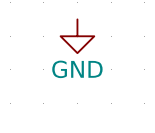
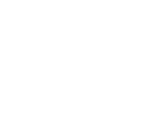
power symbol: GND (77, 36) -> none

